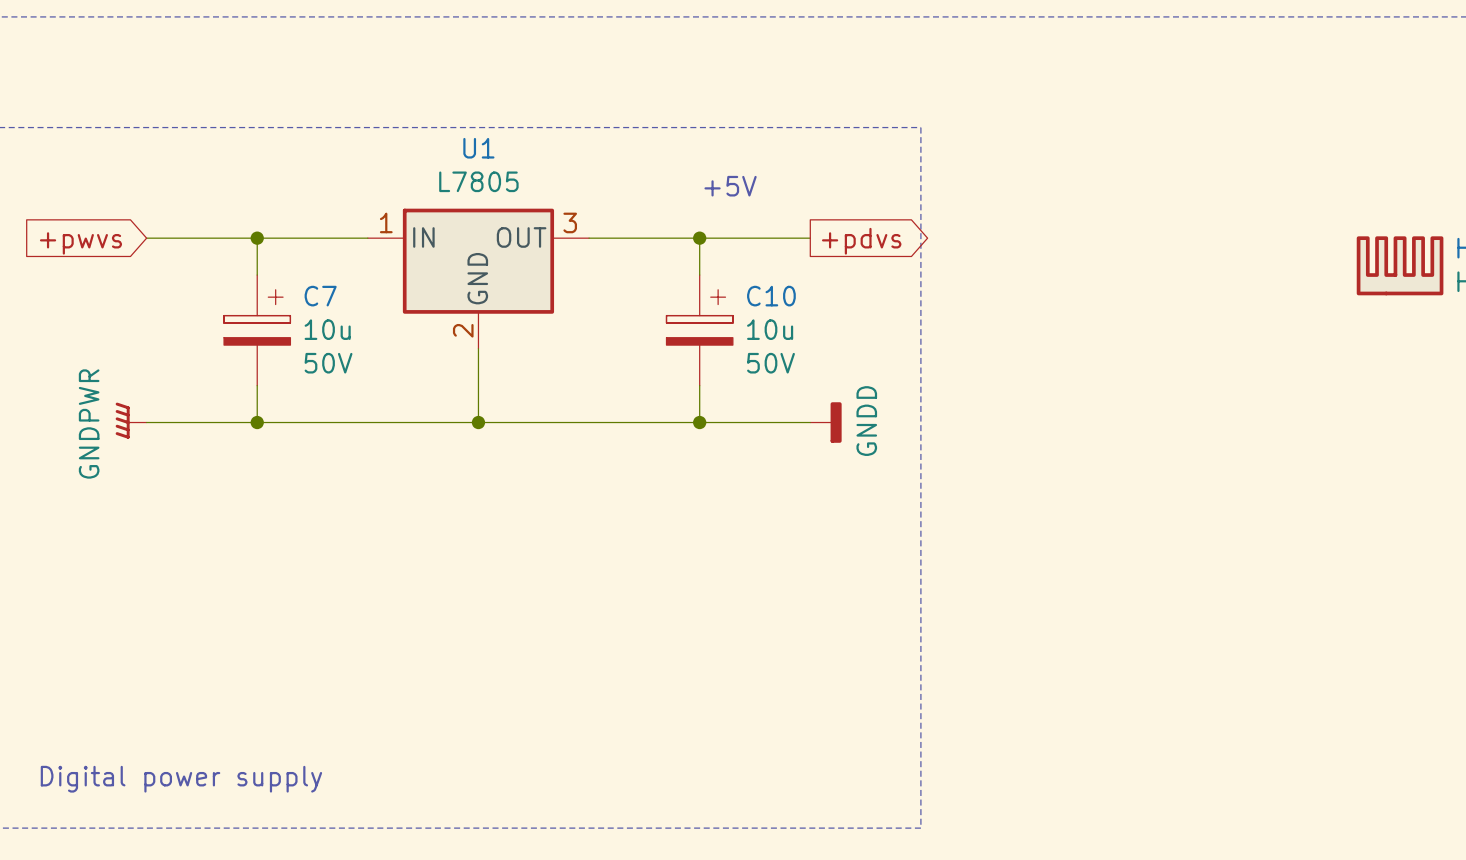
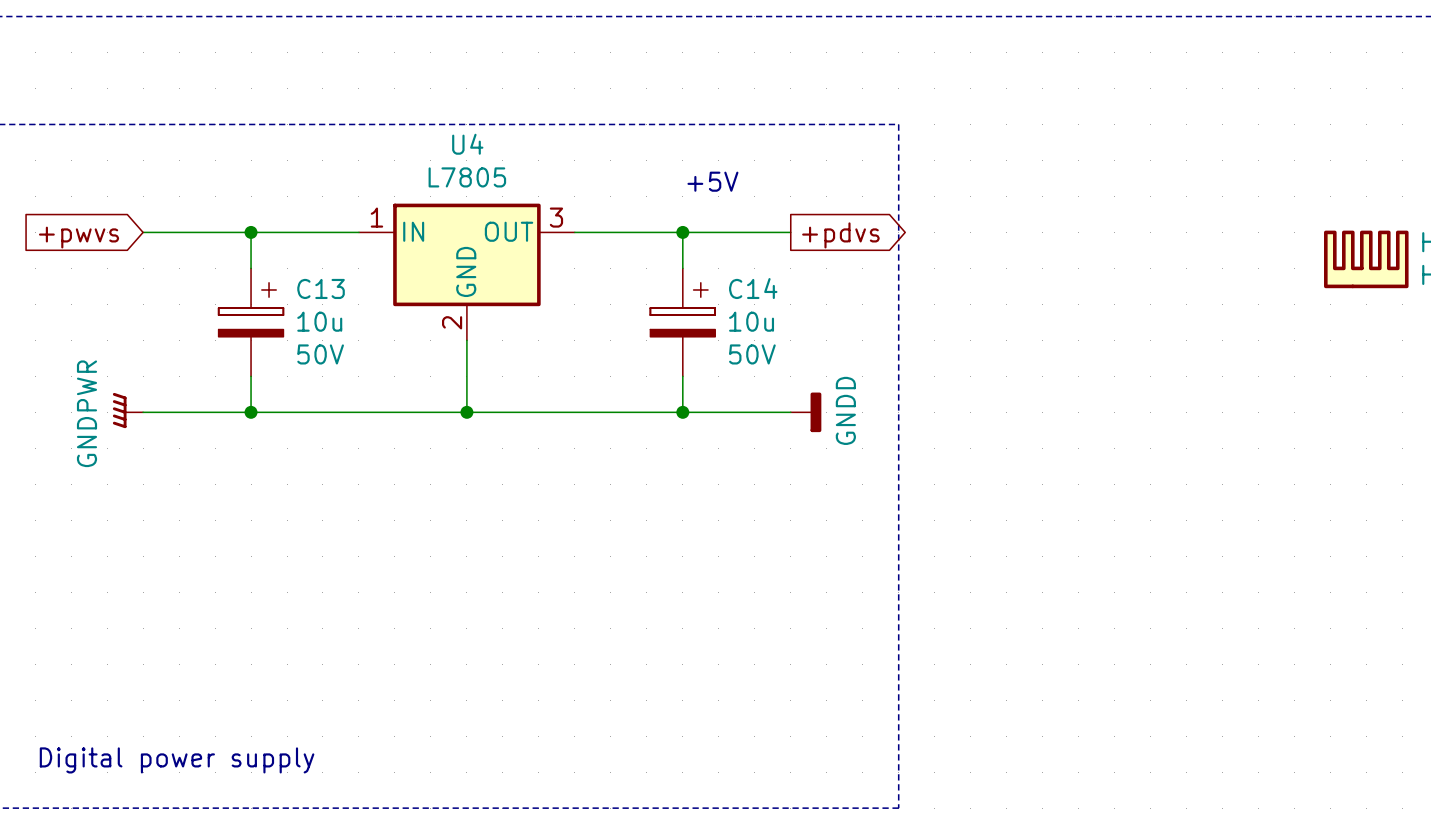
U1 name: U1 (478, 148) -> U4 (467, 144)
C7 name: C7 (320, 296) -> C13 (321, 288)
C10 name: C10 (771, 296) -> C14 (753, 288)

